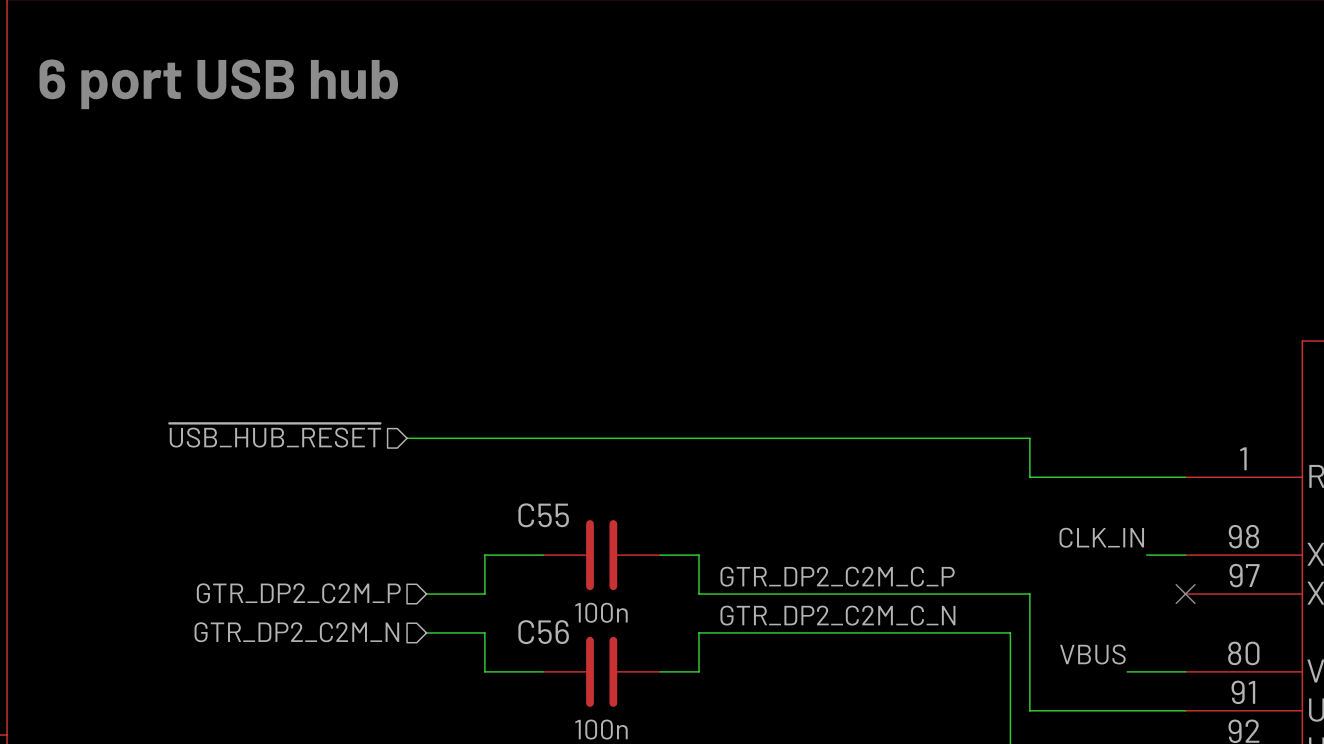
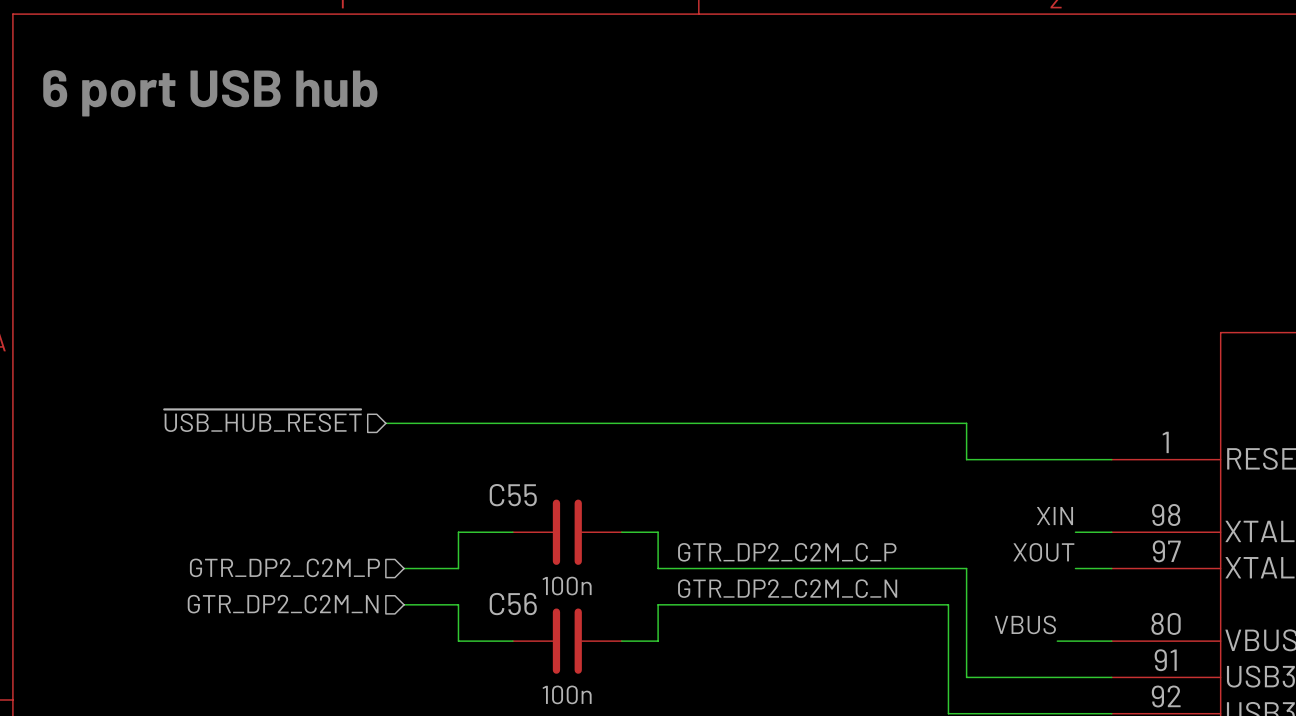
label: CLK_IN (1101, 537) -> XIN (1054, 516)
label: none -> XOUT (1043, 552)
wire: none -> (1075, 568) (1111, 568)
no-connect mark: (1185, 594) -> none

